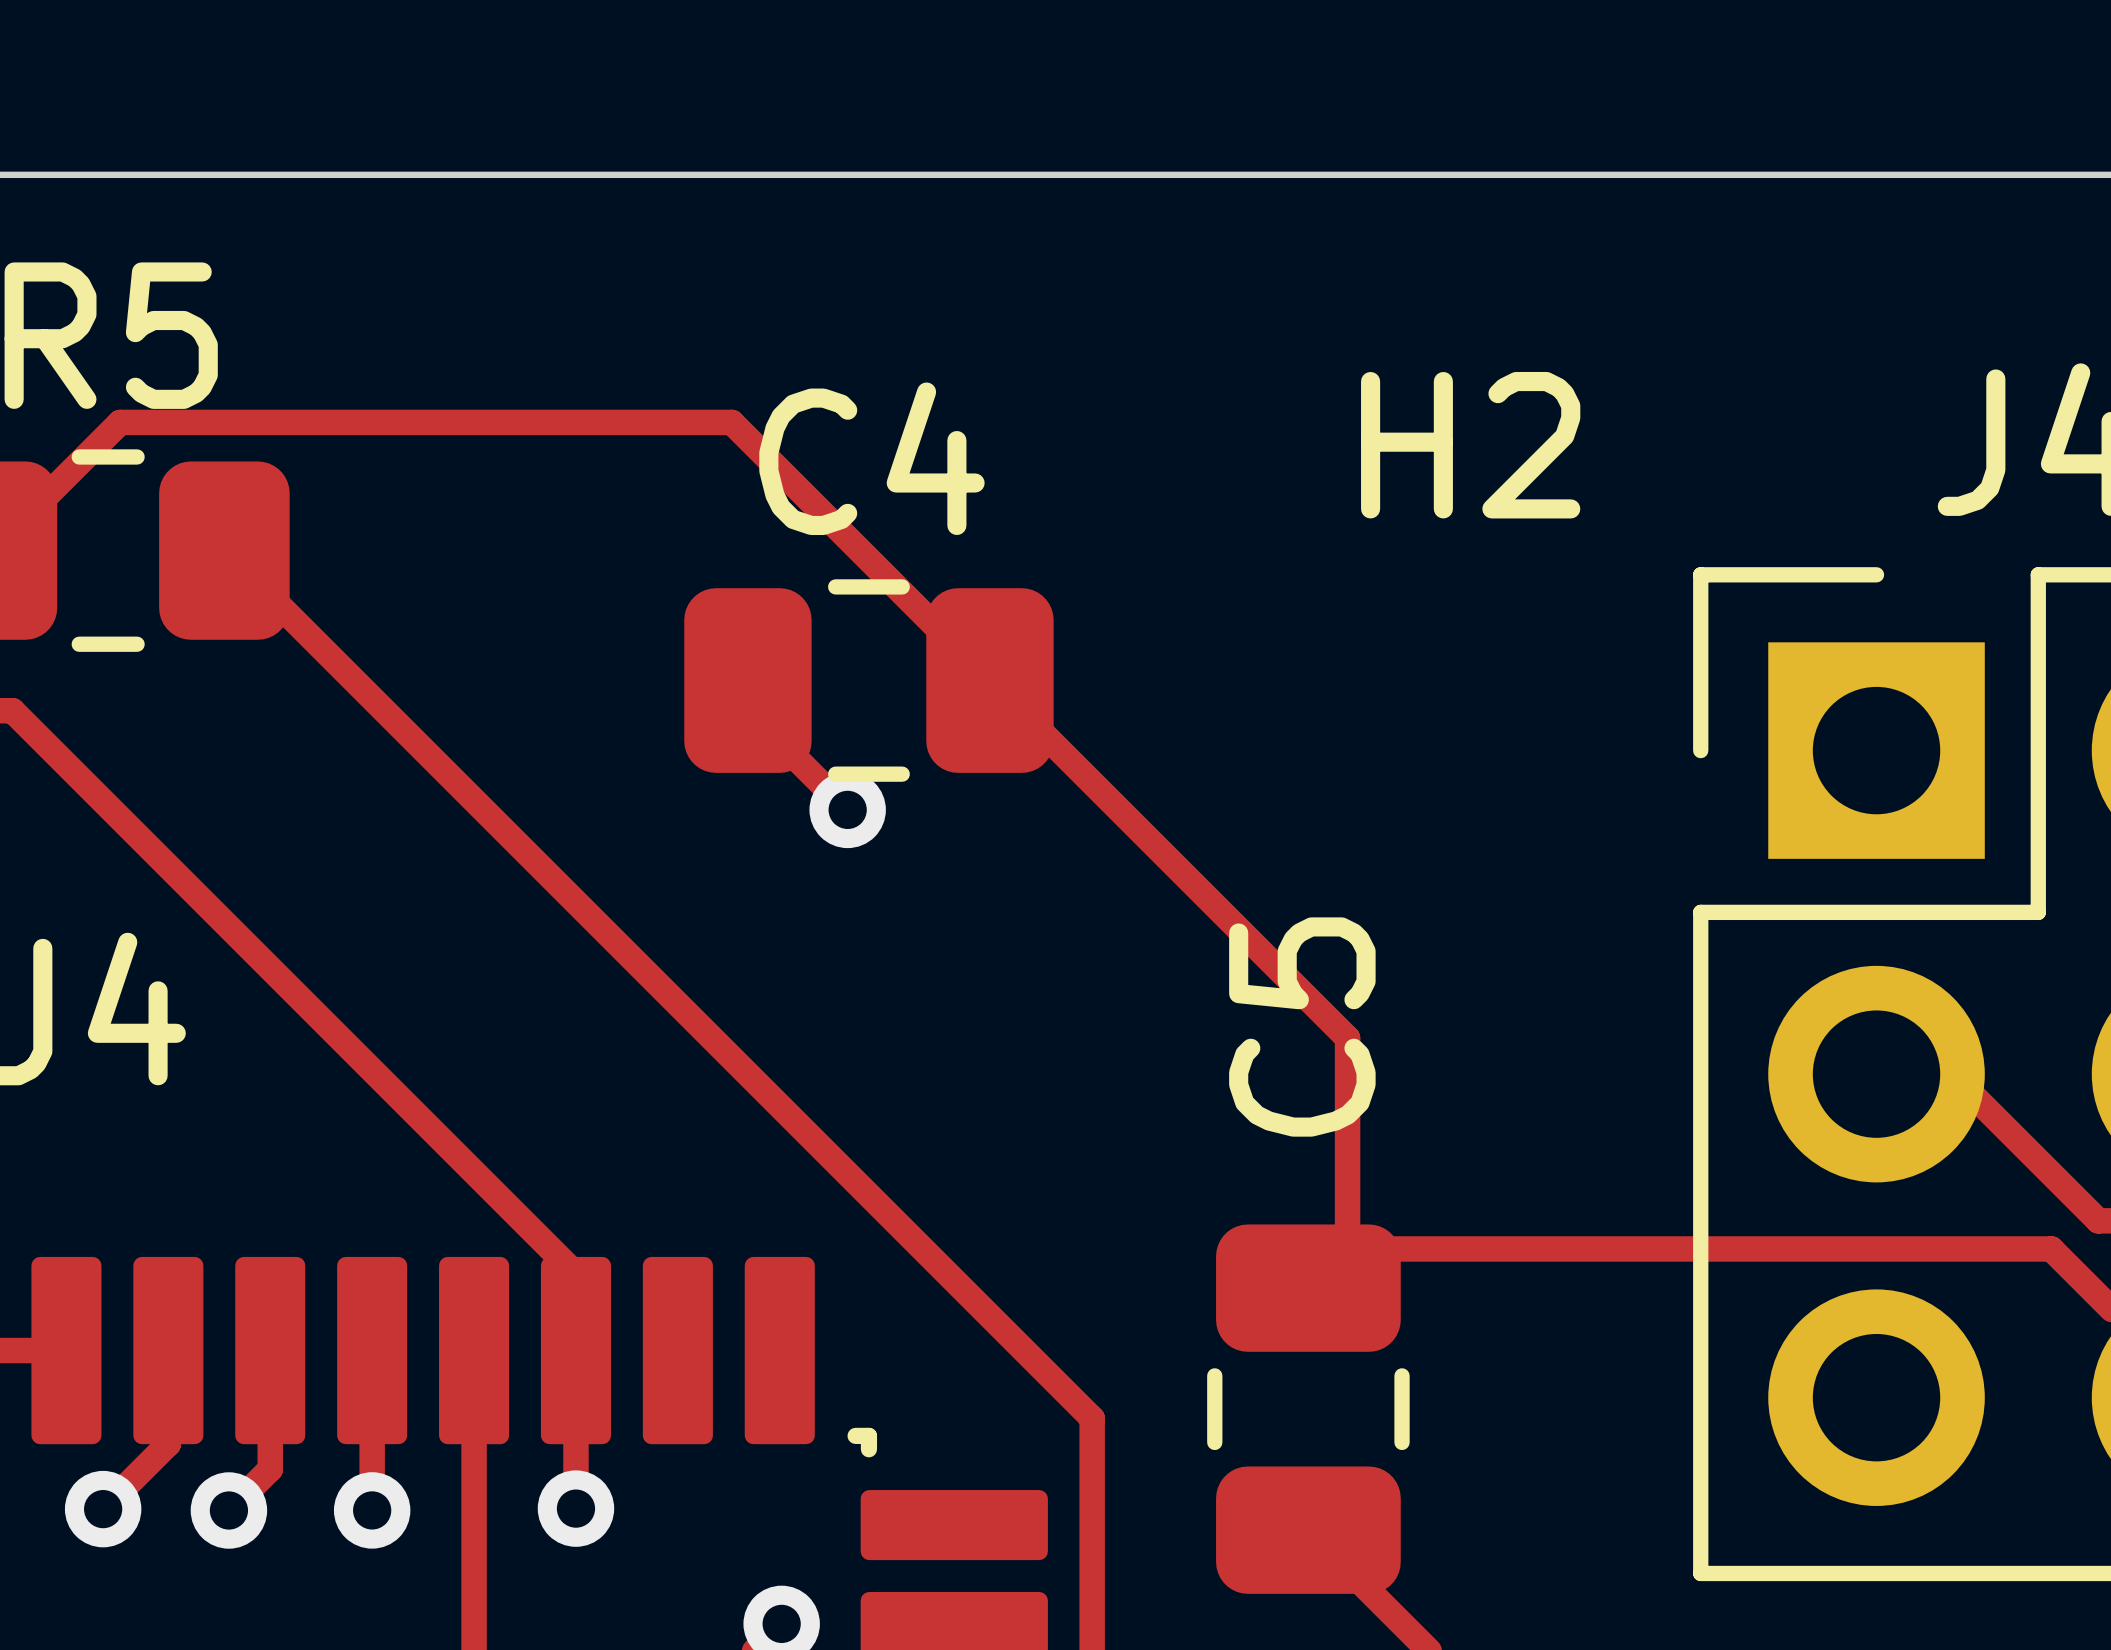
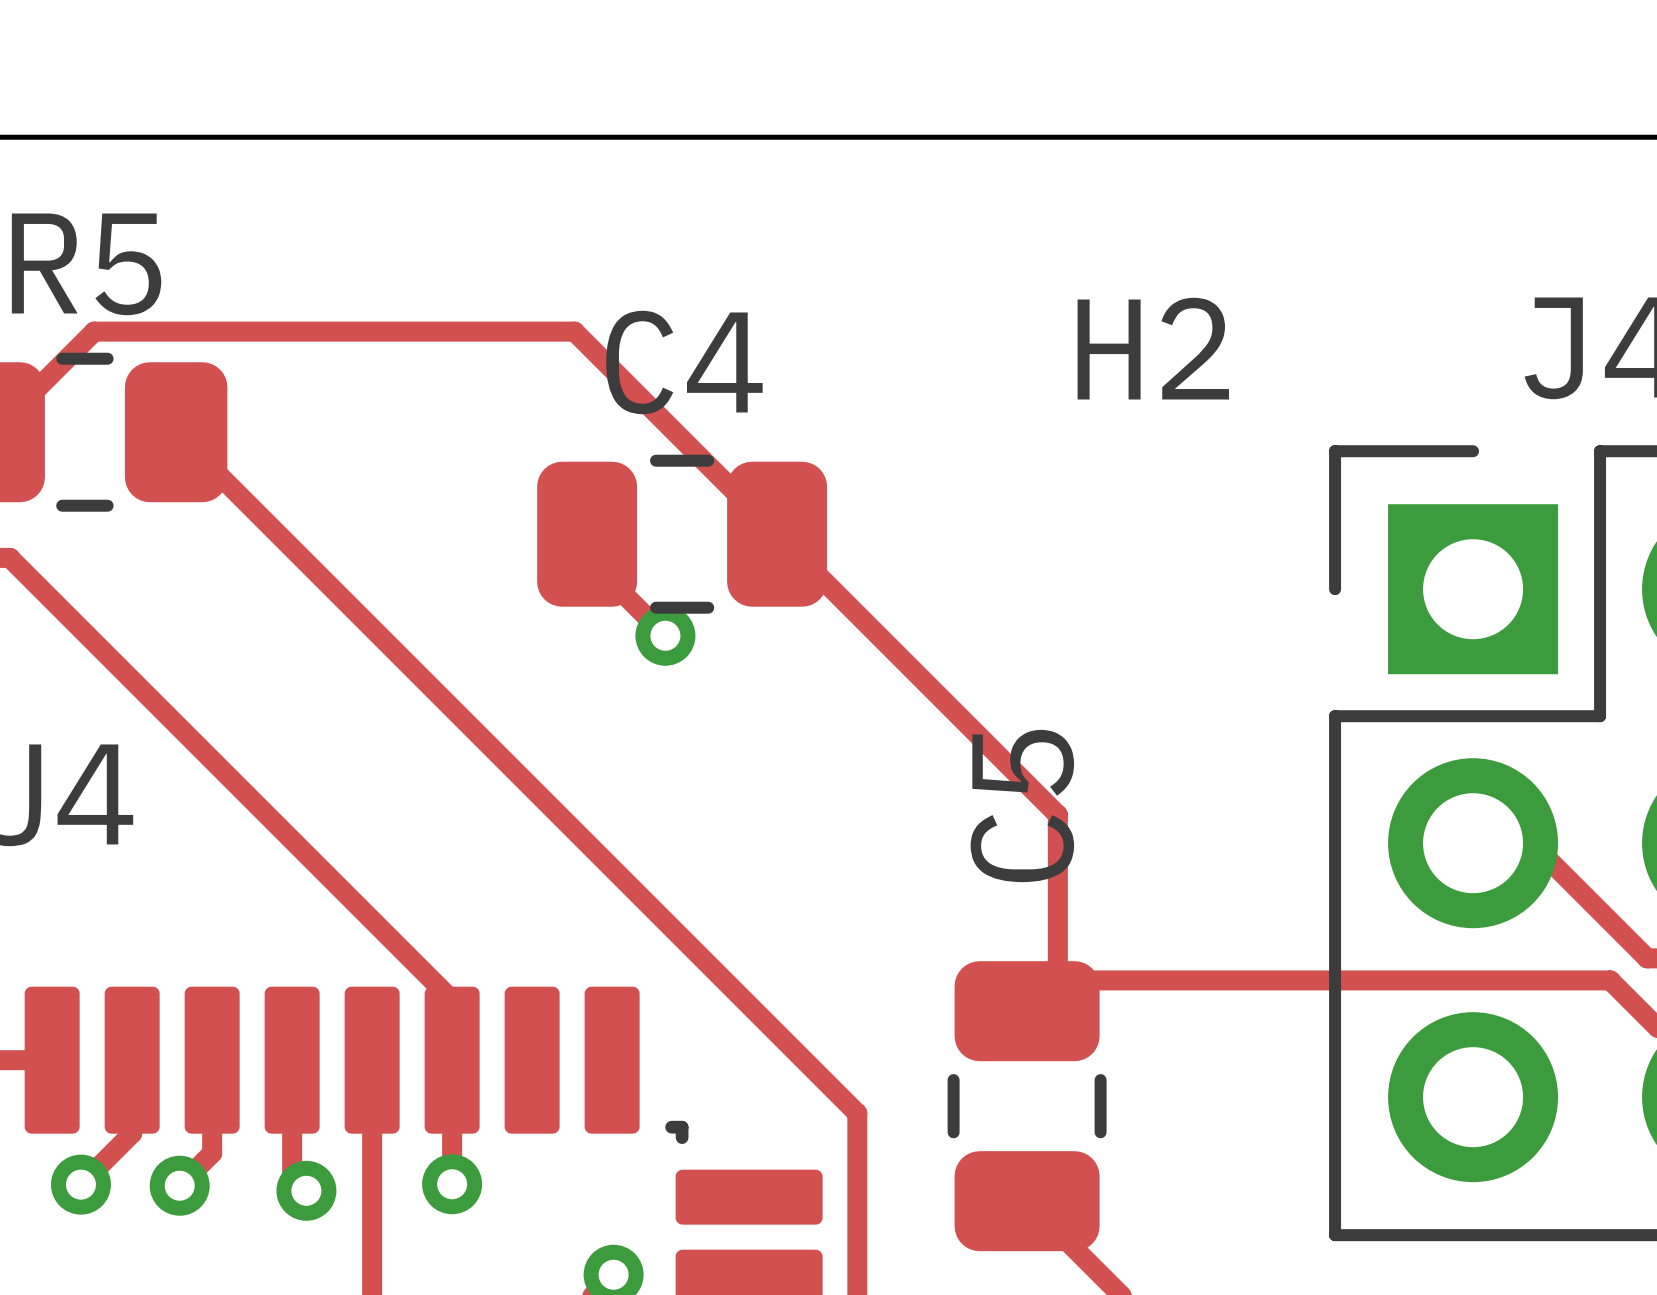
via position: (372, 1510) -> (306, 1190)

